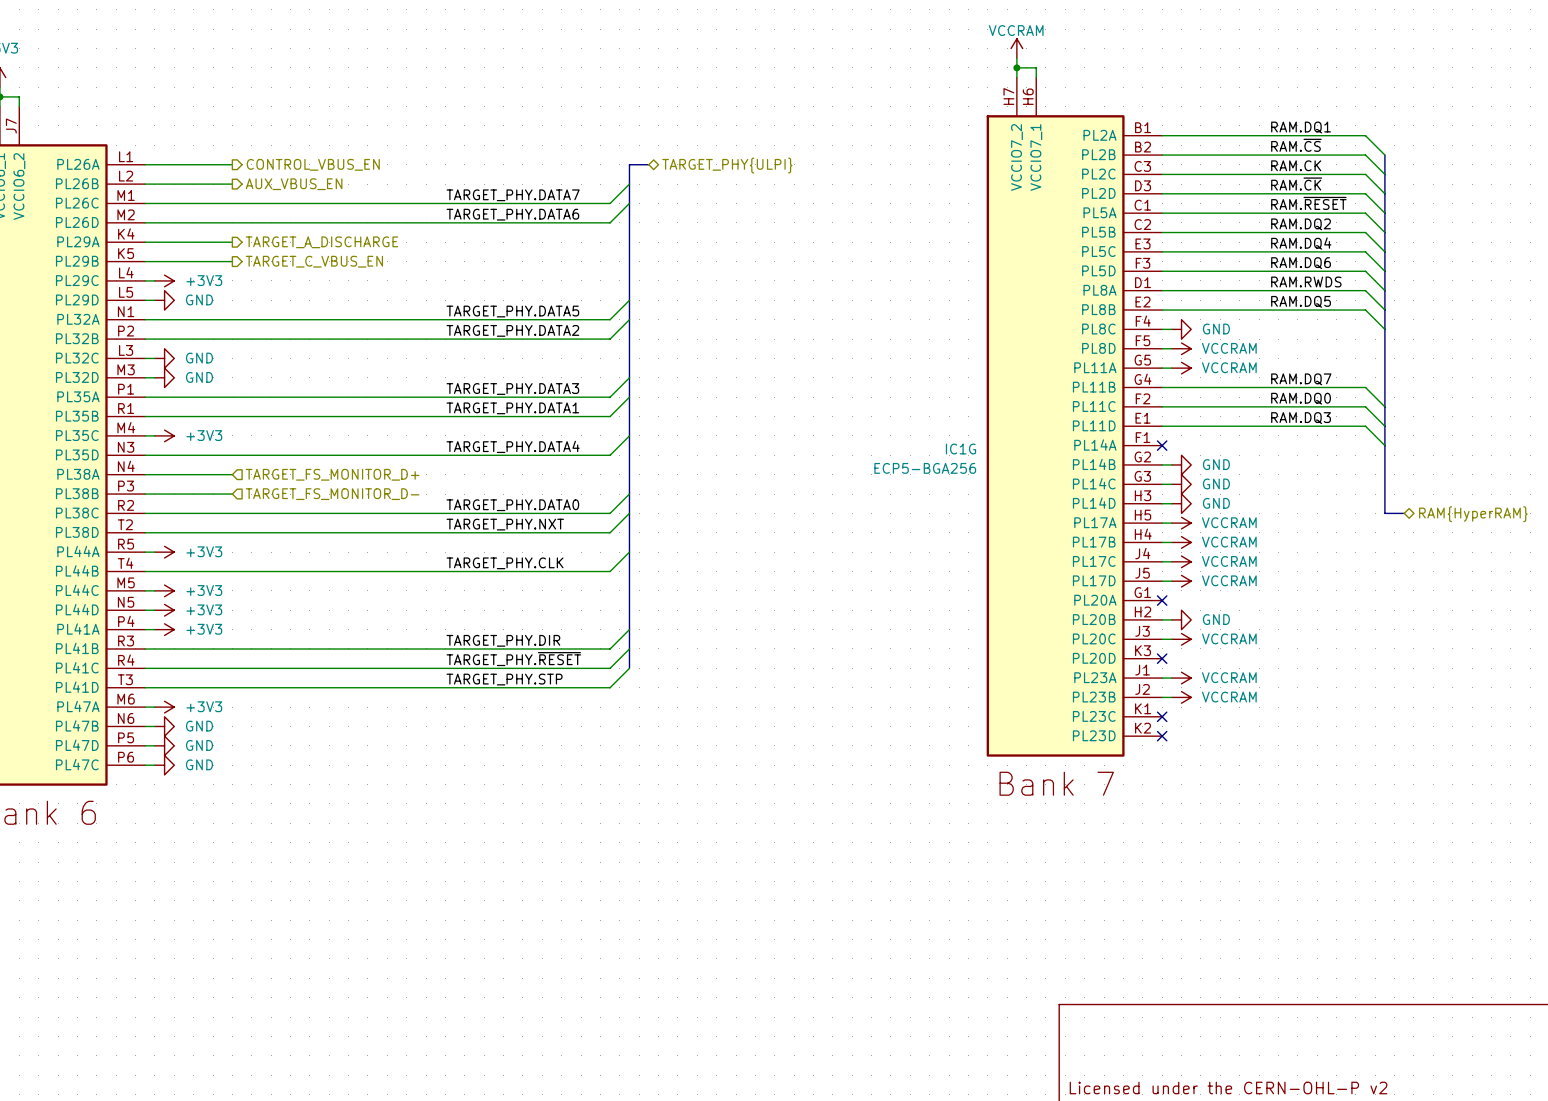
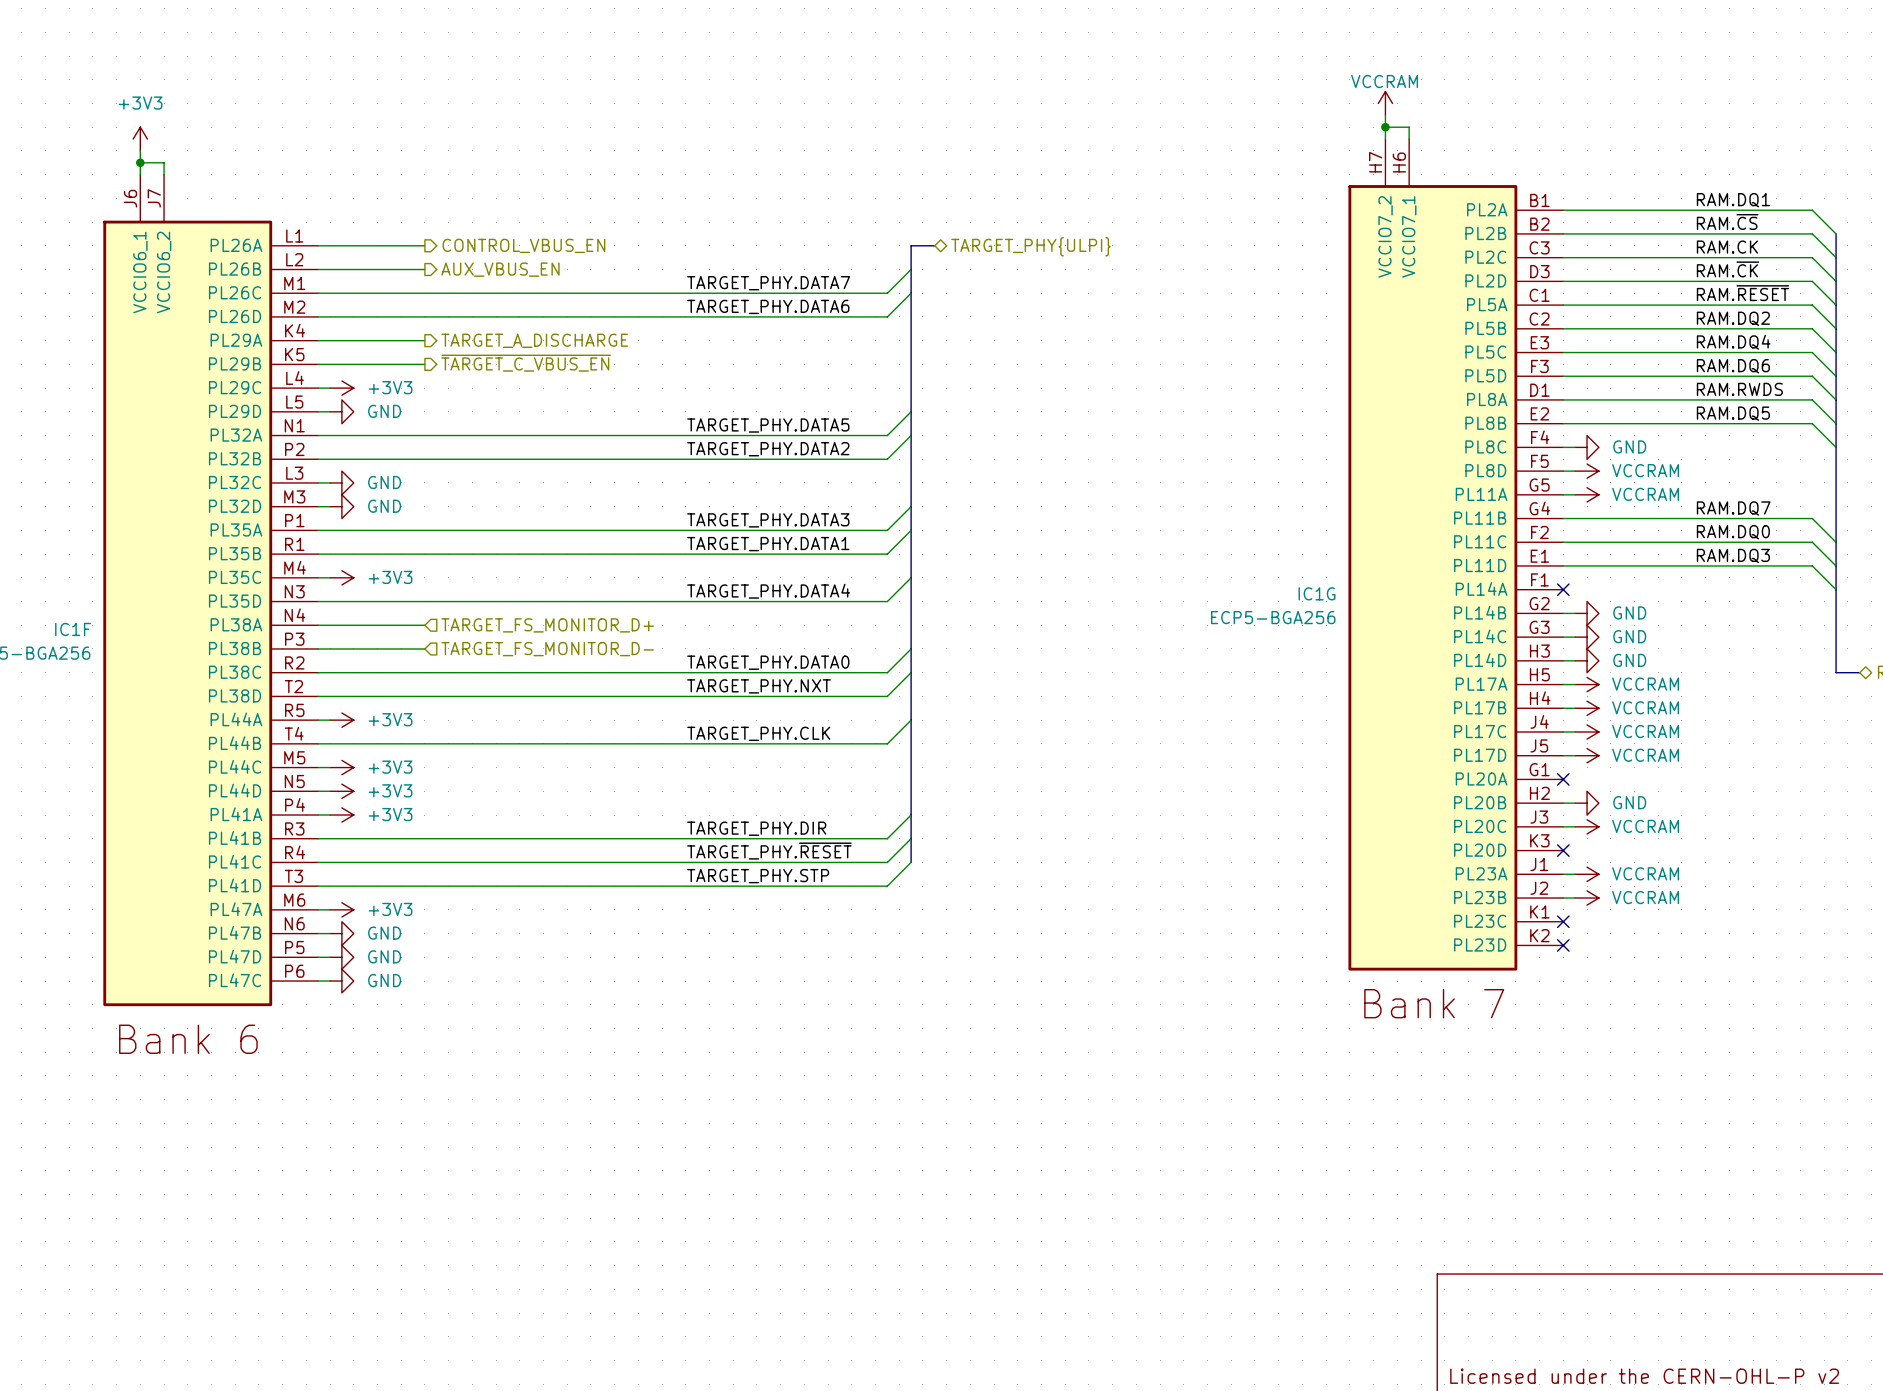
hierarchical label: TARGET_C_VBUS_EN (314, 261) -> ~{TARGET_C_VBUS_EN} (526, 363)

